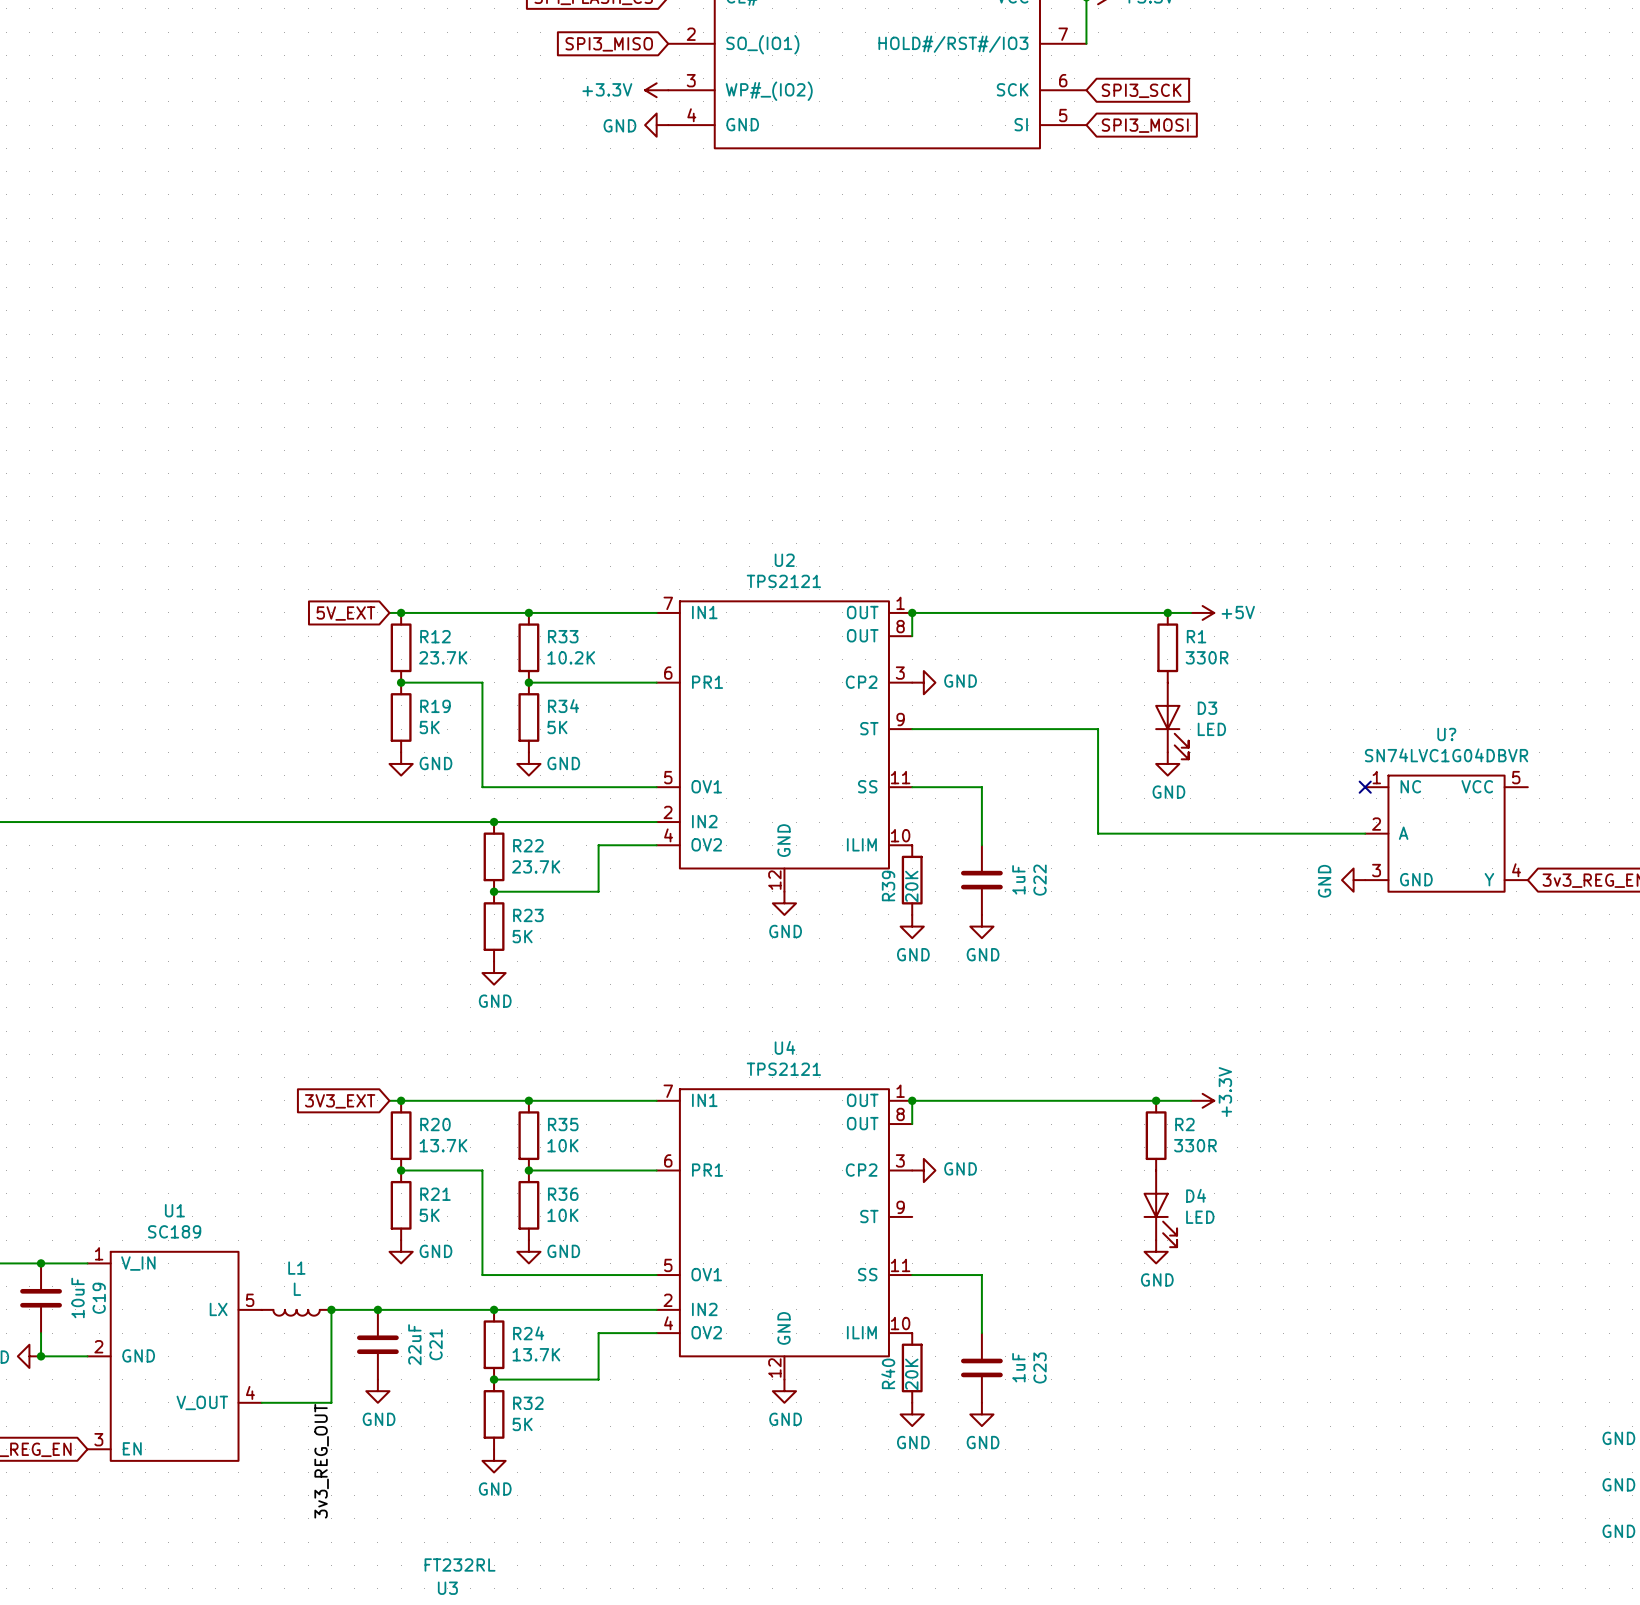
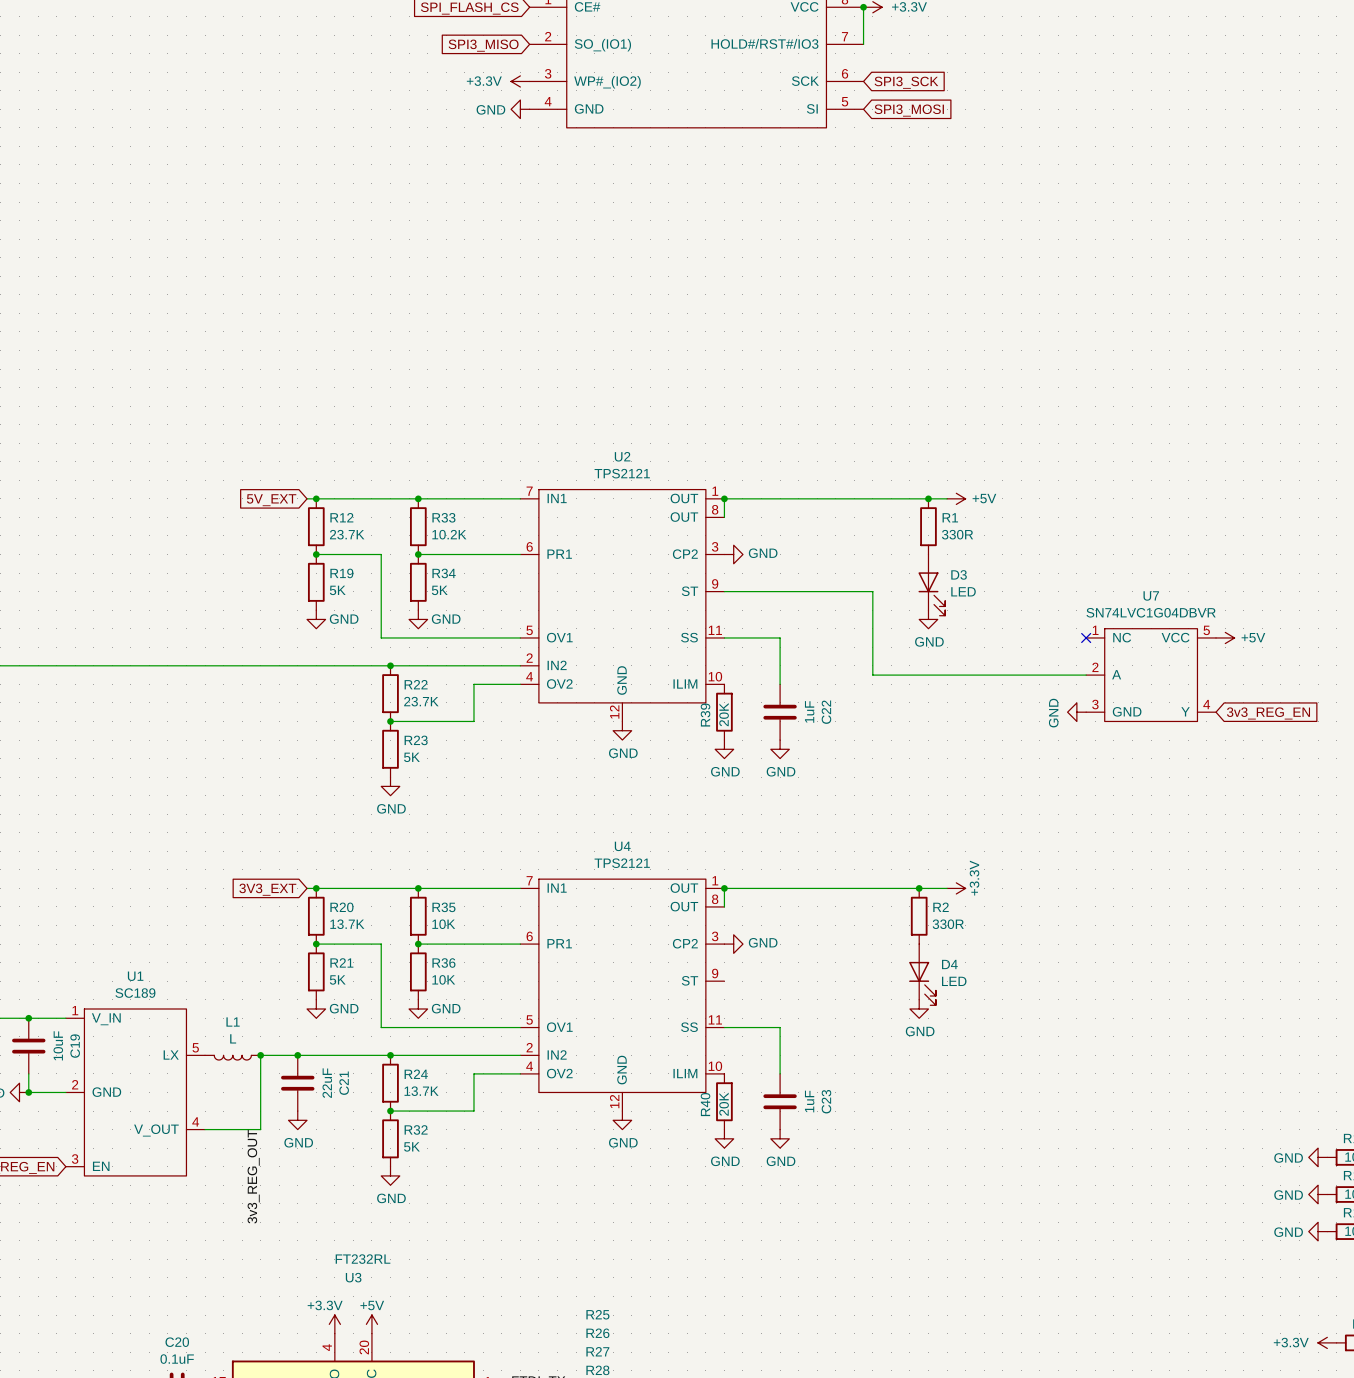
U? name: U? (1446, 734) -> U7 (1151, 595)
power symbol: none -> +5V (1225, 637)

